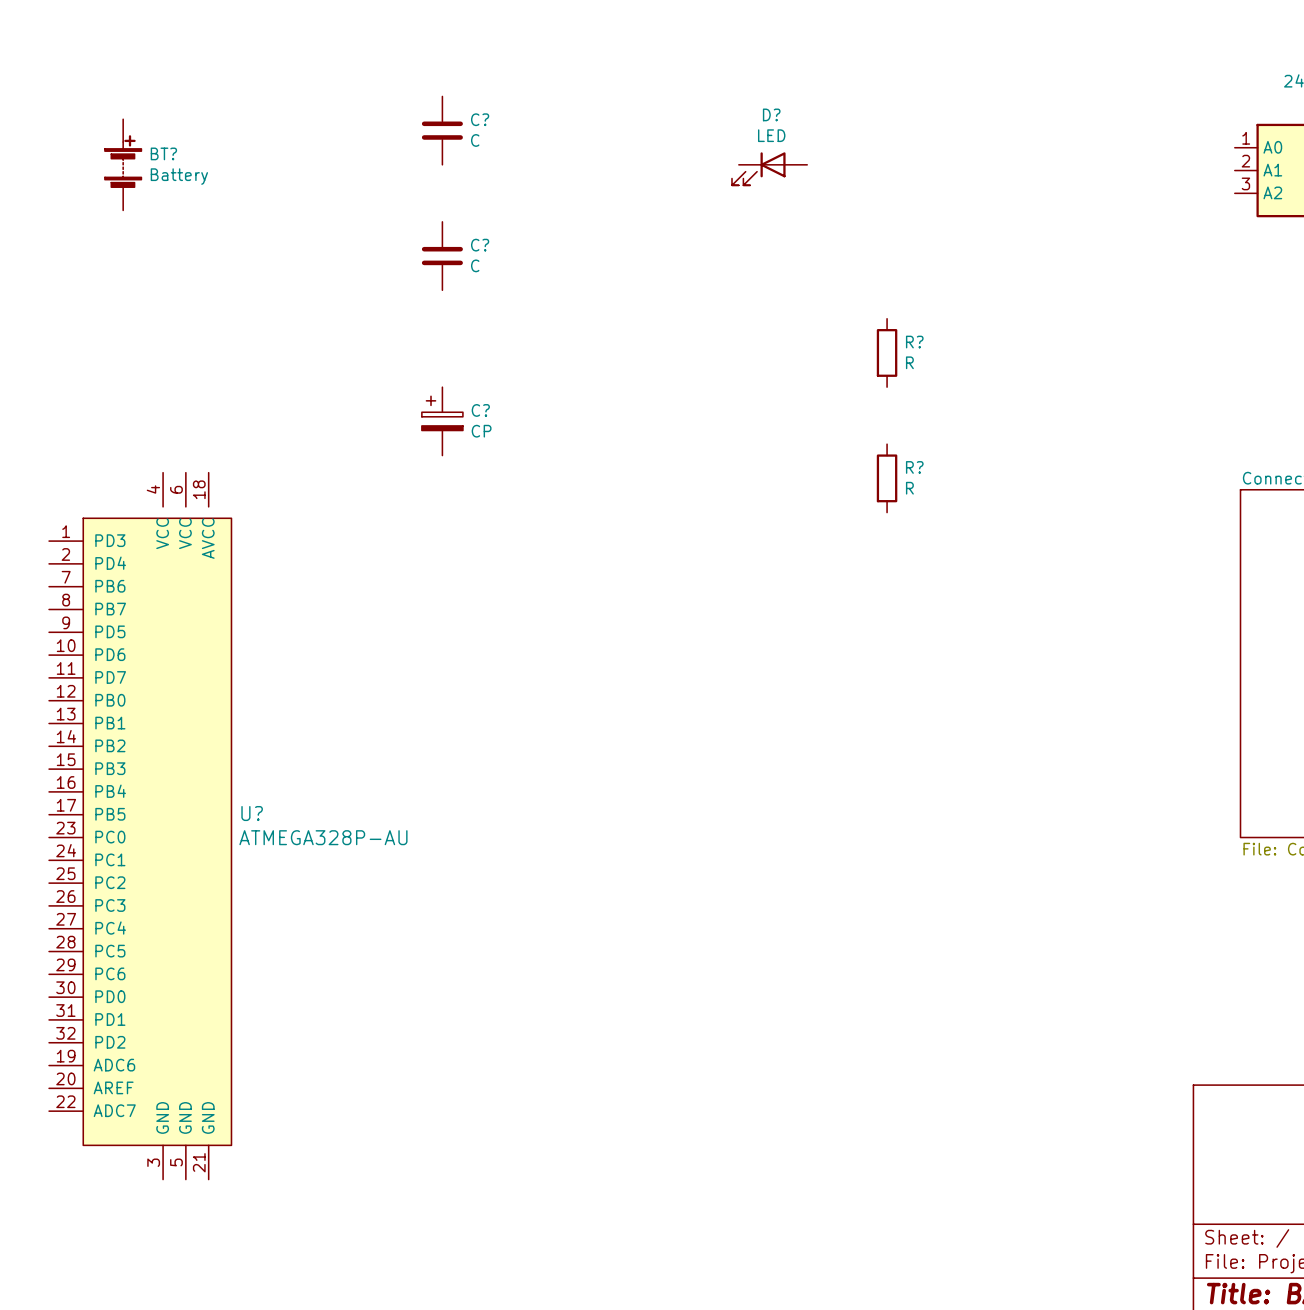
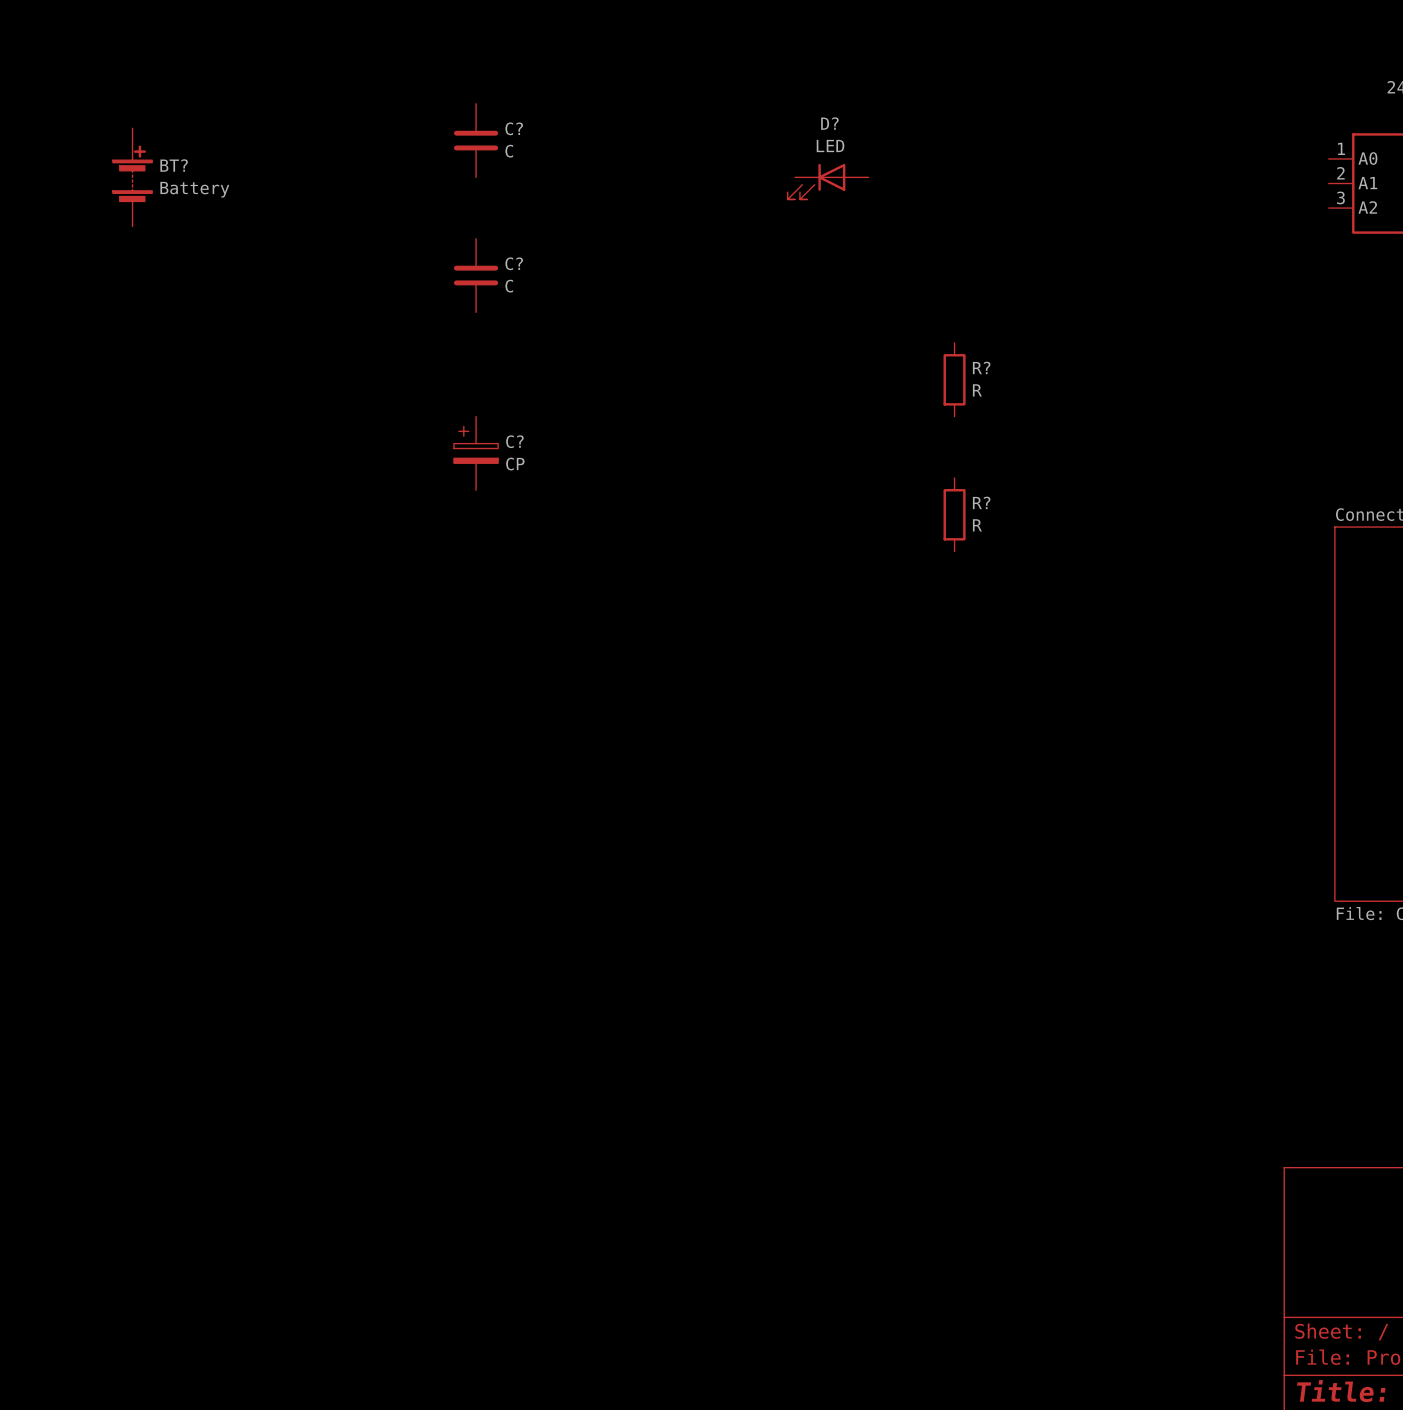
U?: ATMEGA328P-AU (140, 826) -> none

